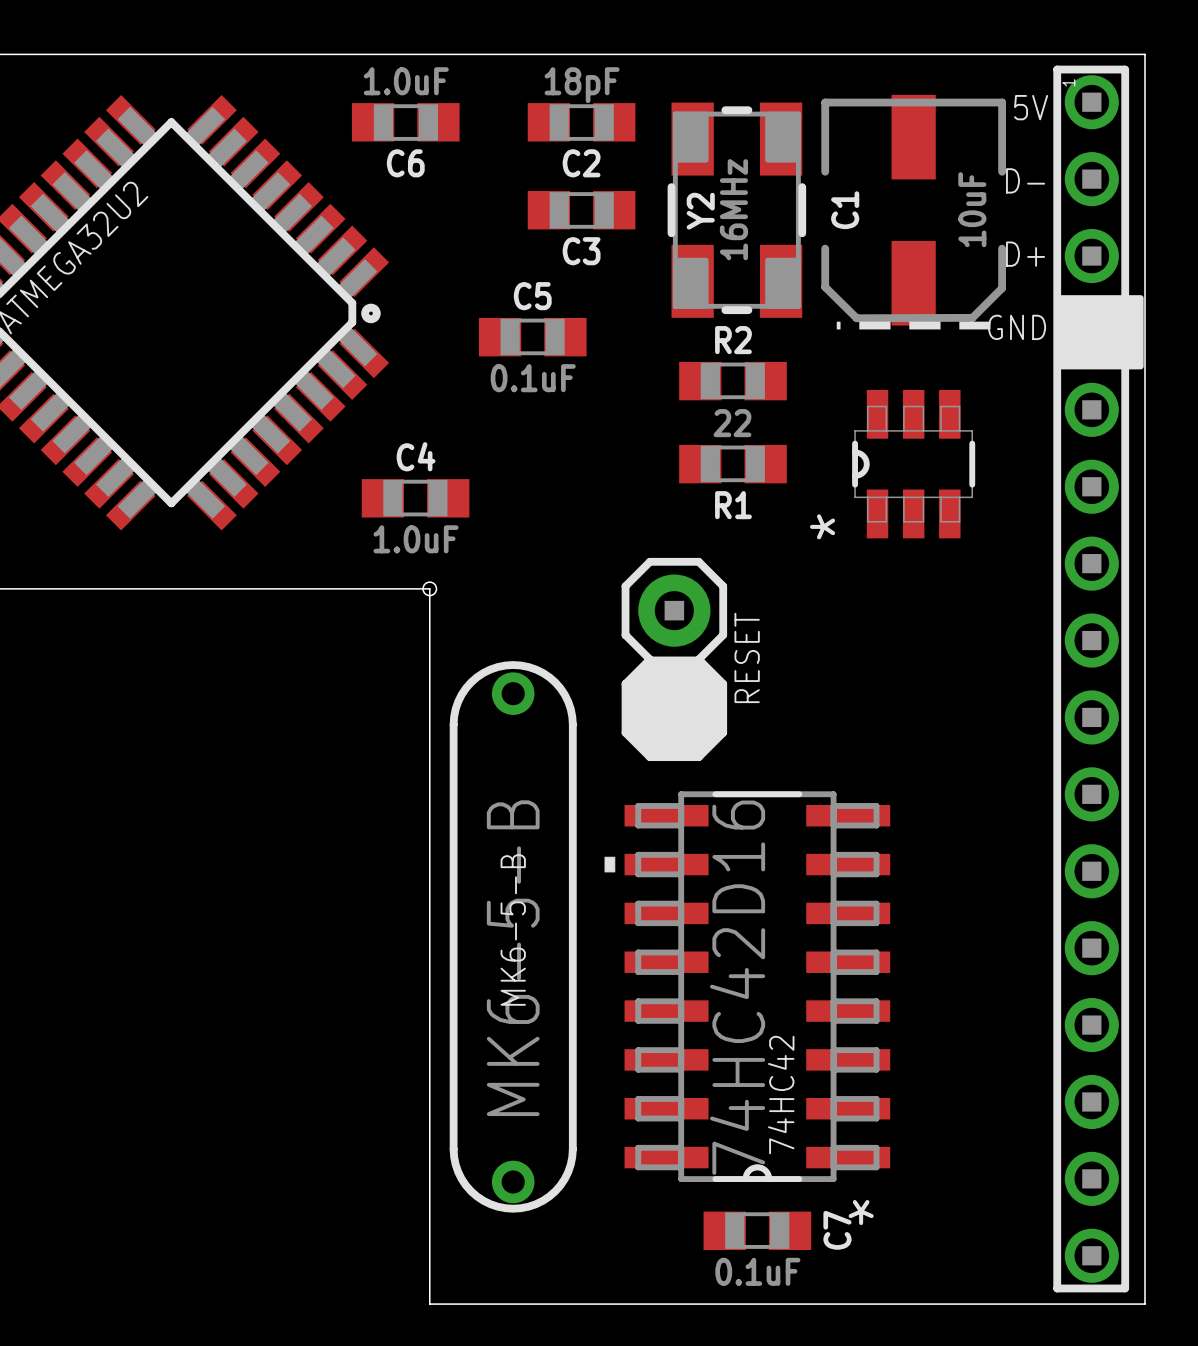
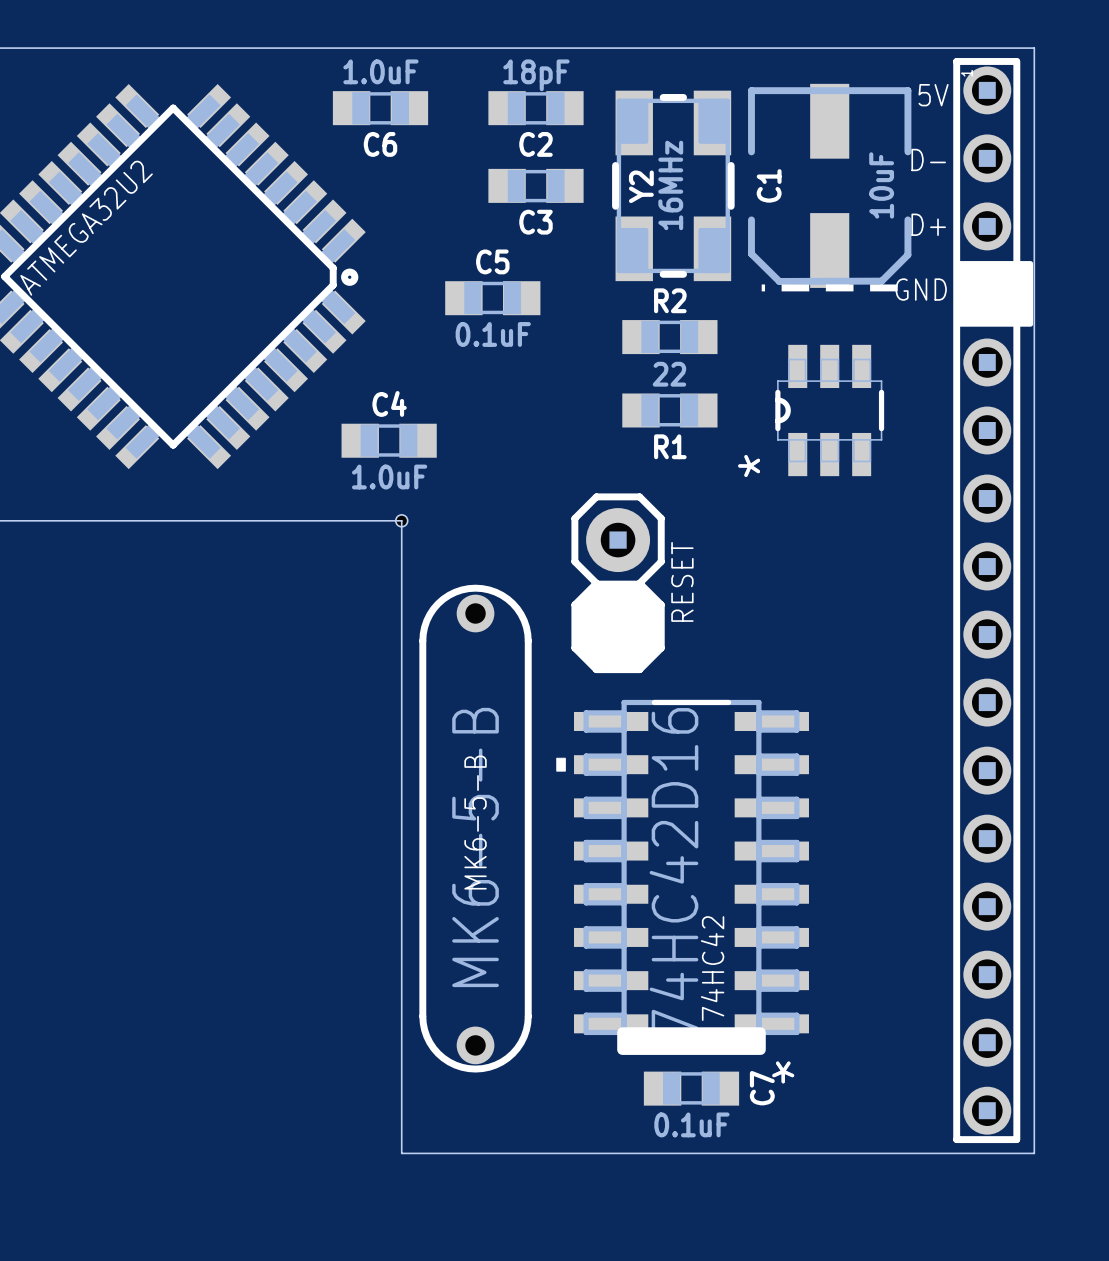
drawing: none -> [617, 1027, 766, 1055]

